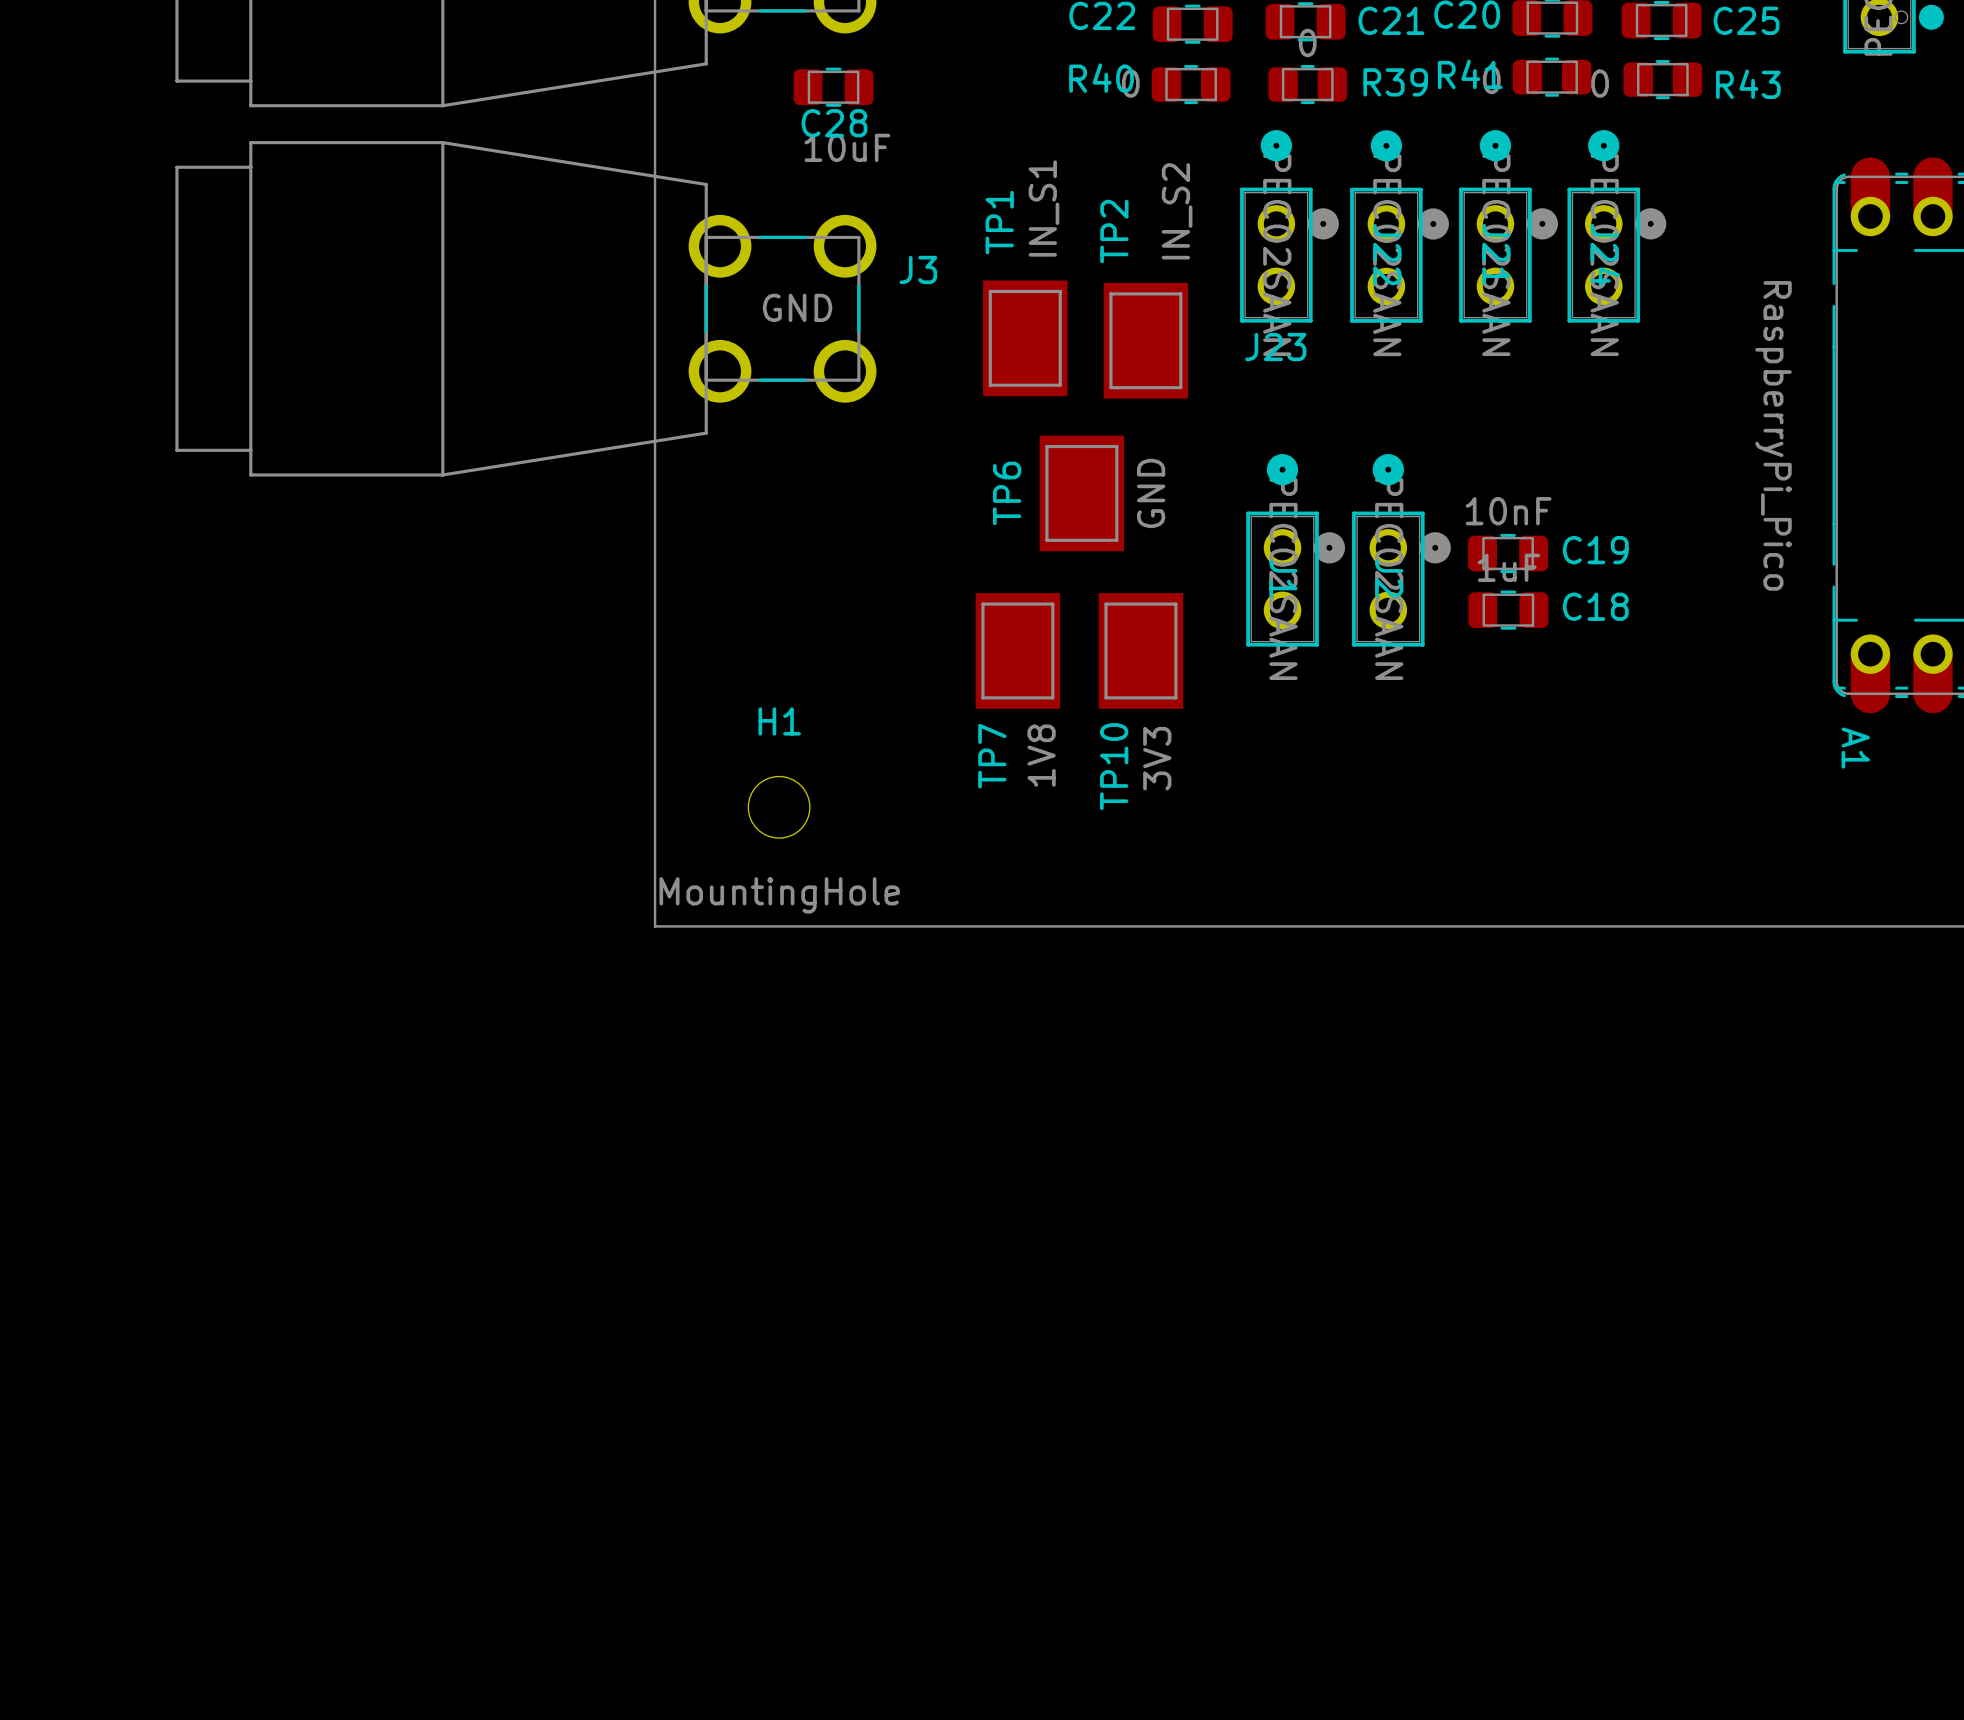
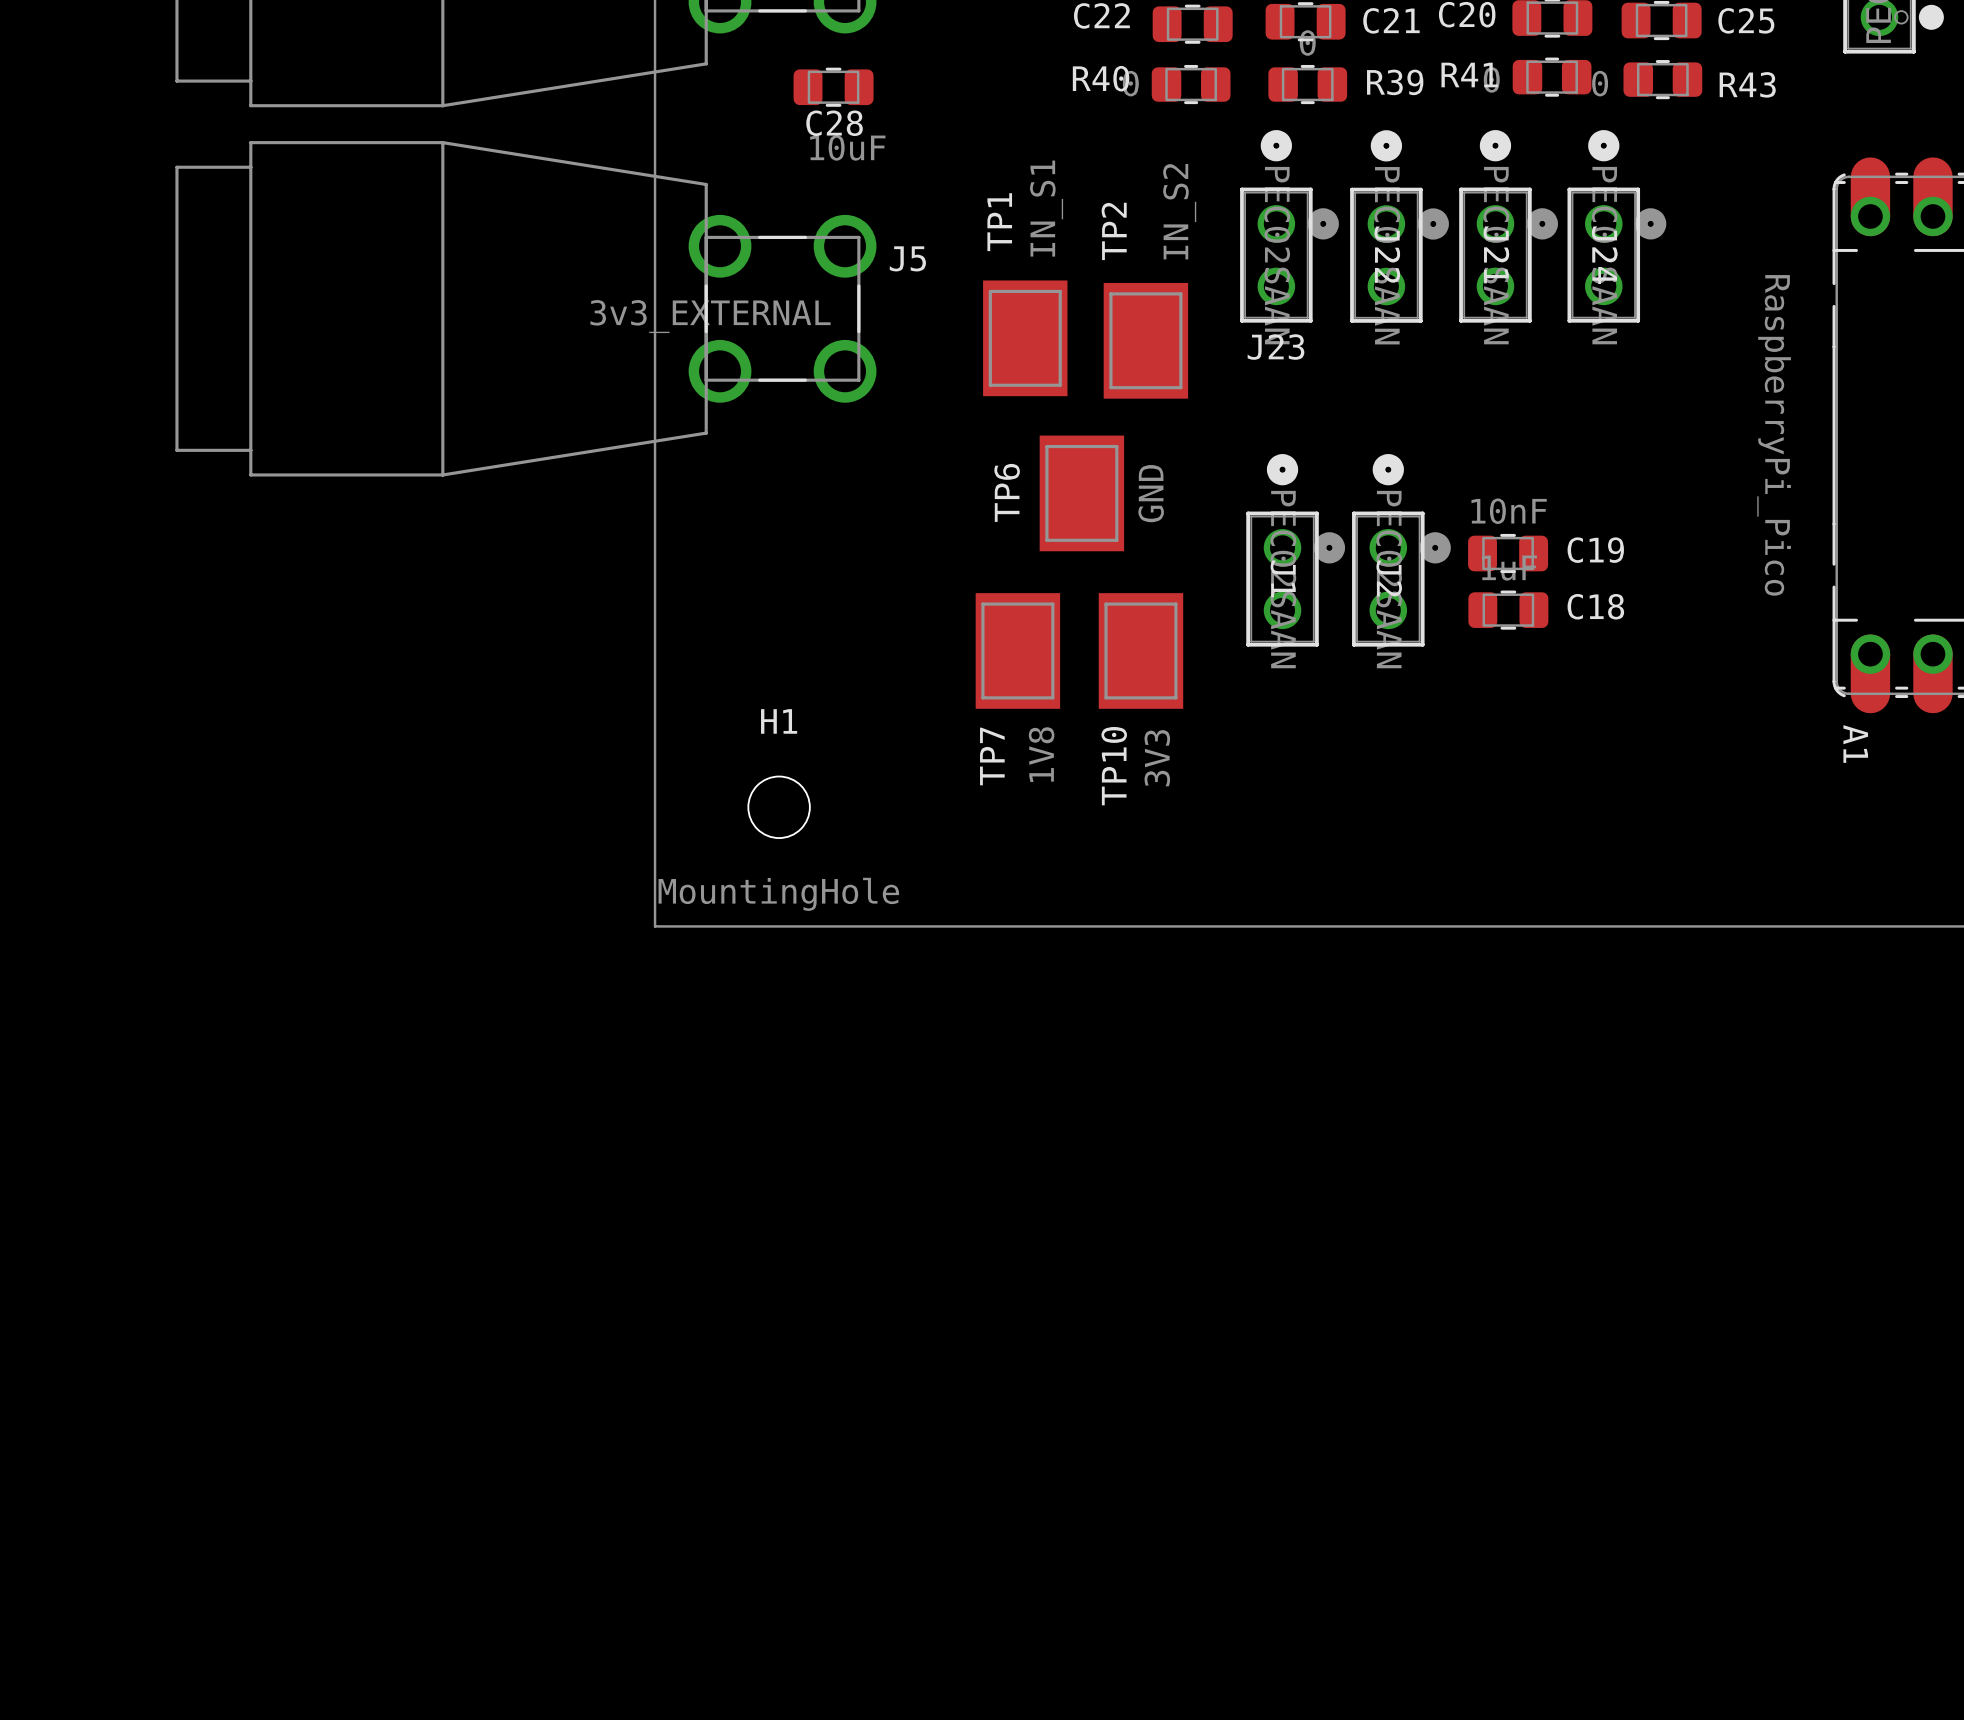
J3 name: J3 (918, 269) -> J5 (907, 258)
J3 value: GND (797, 307) -> 3v3_EXTERNAL (710, 316)

